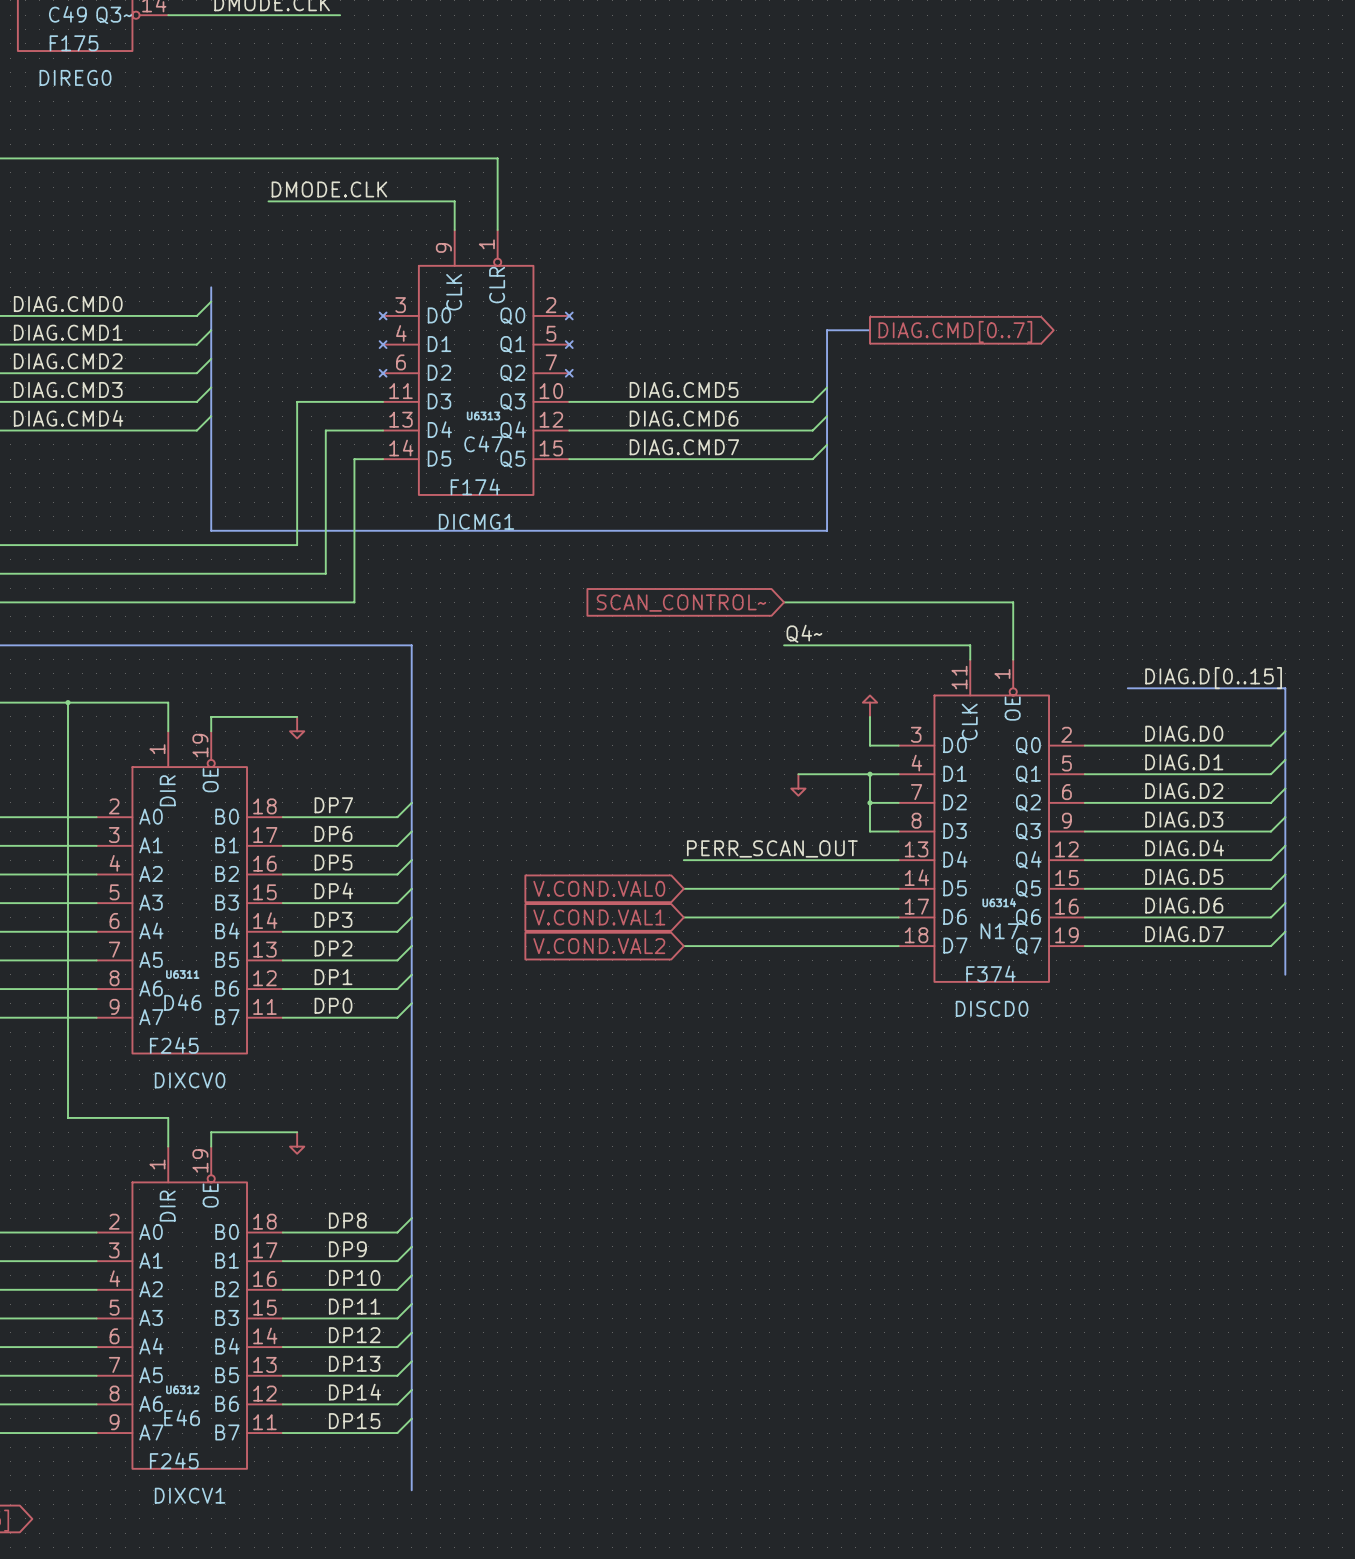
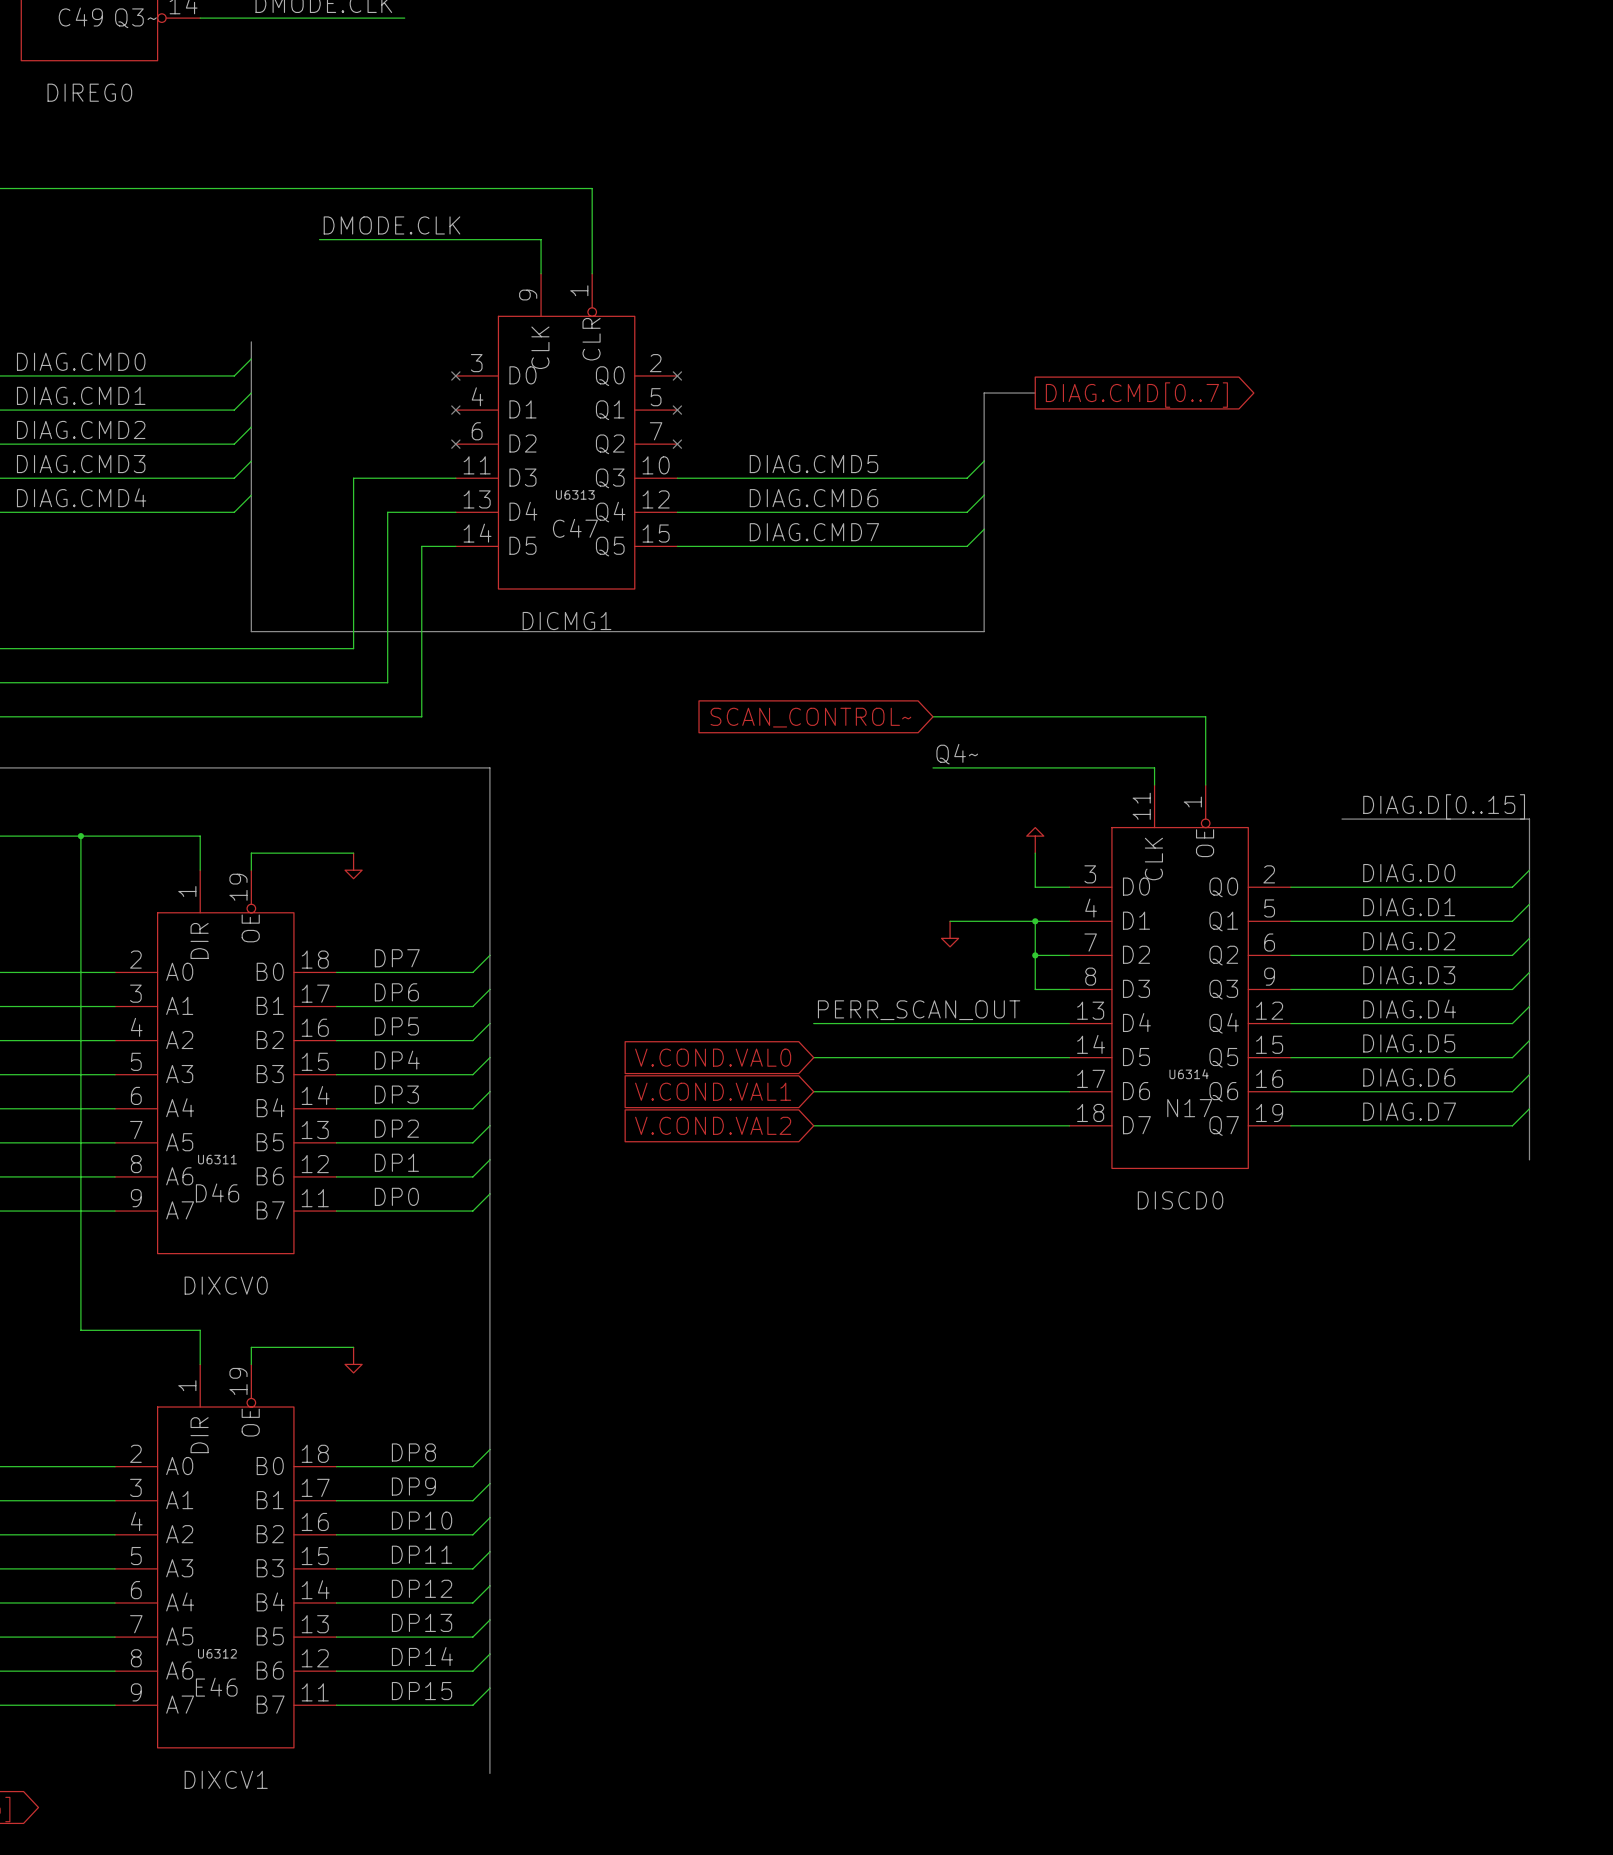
part value: F175 (74, 43) -> none
U6313 value: F174 (475, 486) -> none
U6314 value: F374 (990, 973) -> none
U6311 value: F245 (174, 1045) -> none
U6312 value: F245 (174, 1460) -> none

